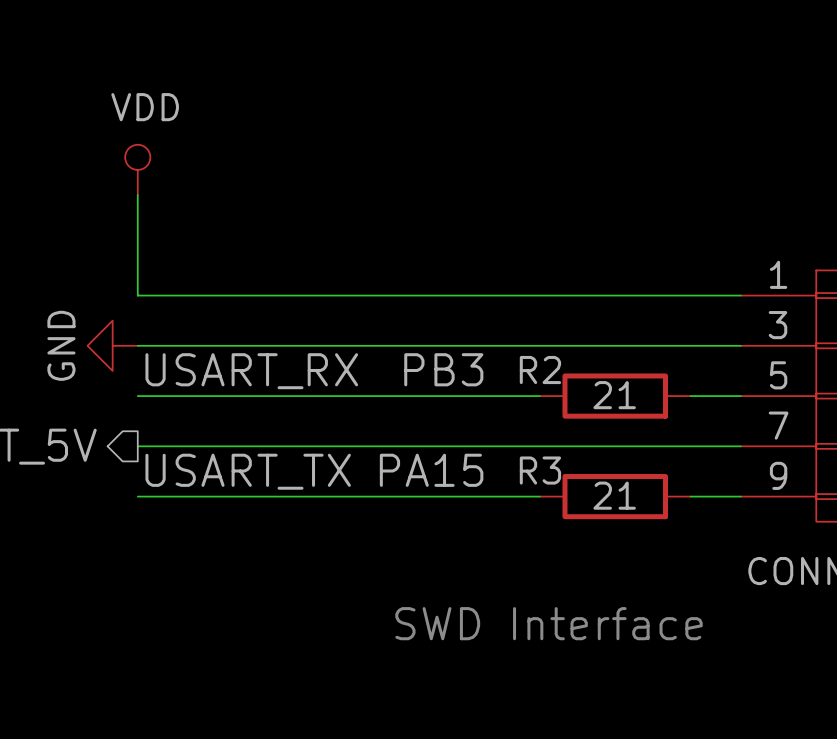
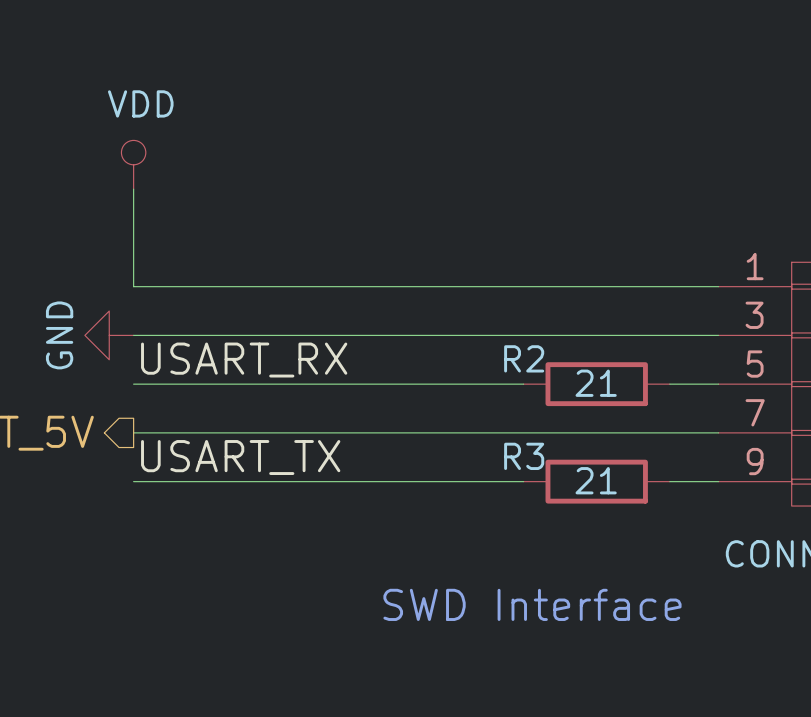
label: PB3 (443, 369) -> none
label: PA15 (431, 470) -> none

